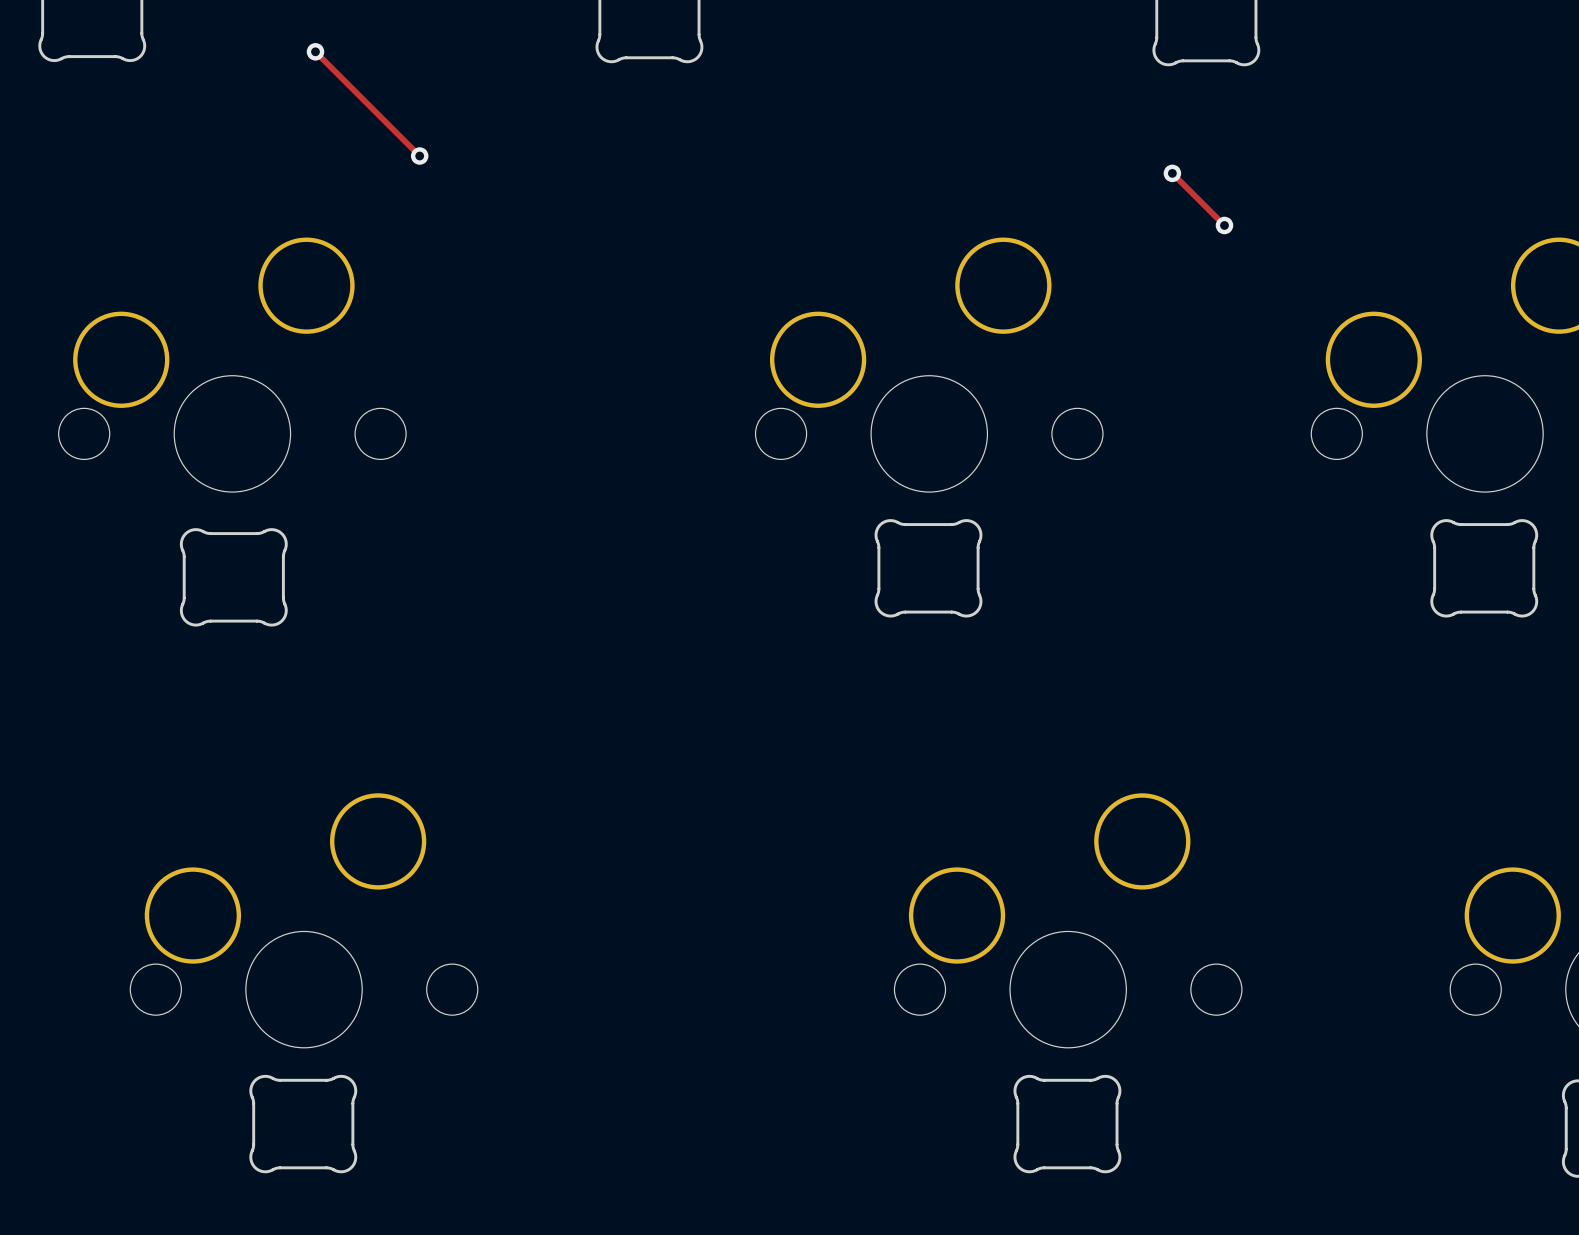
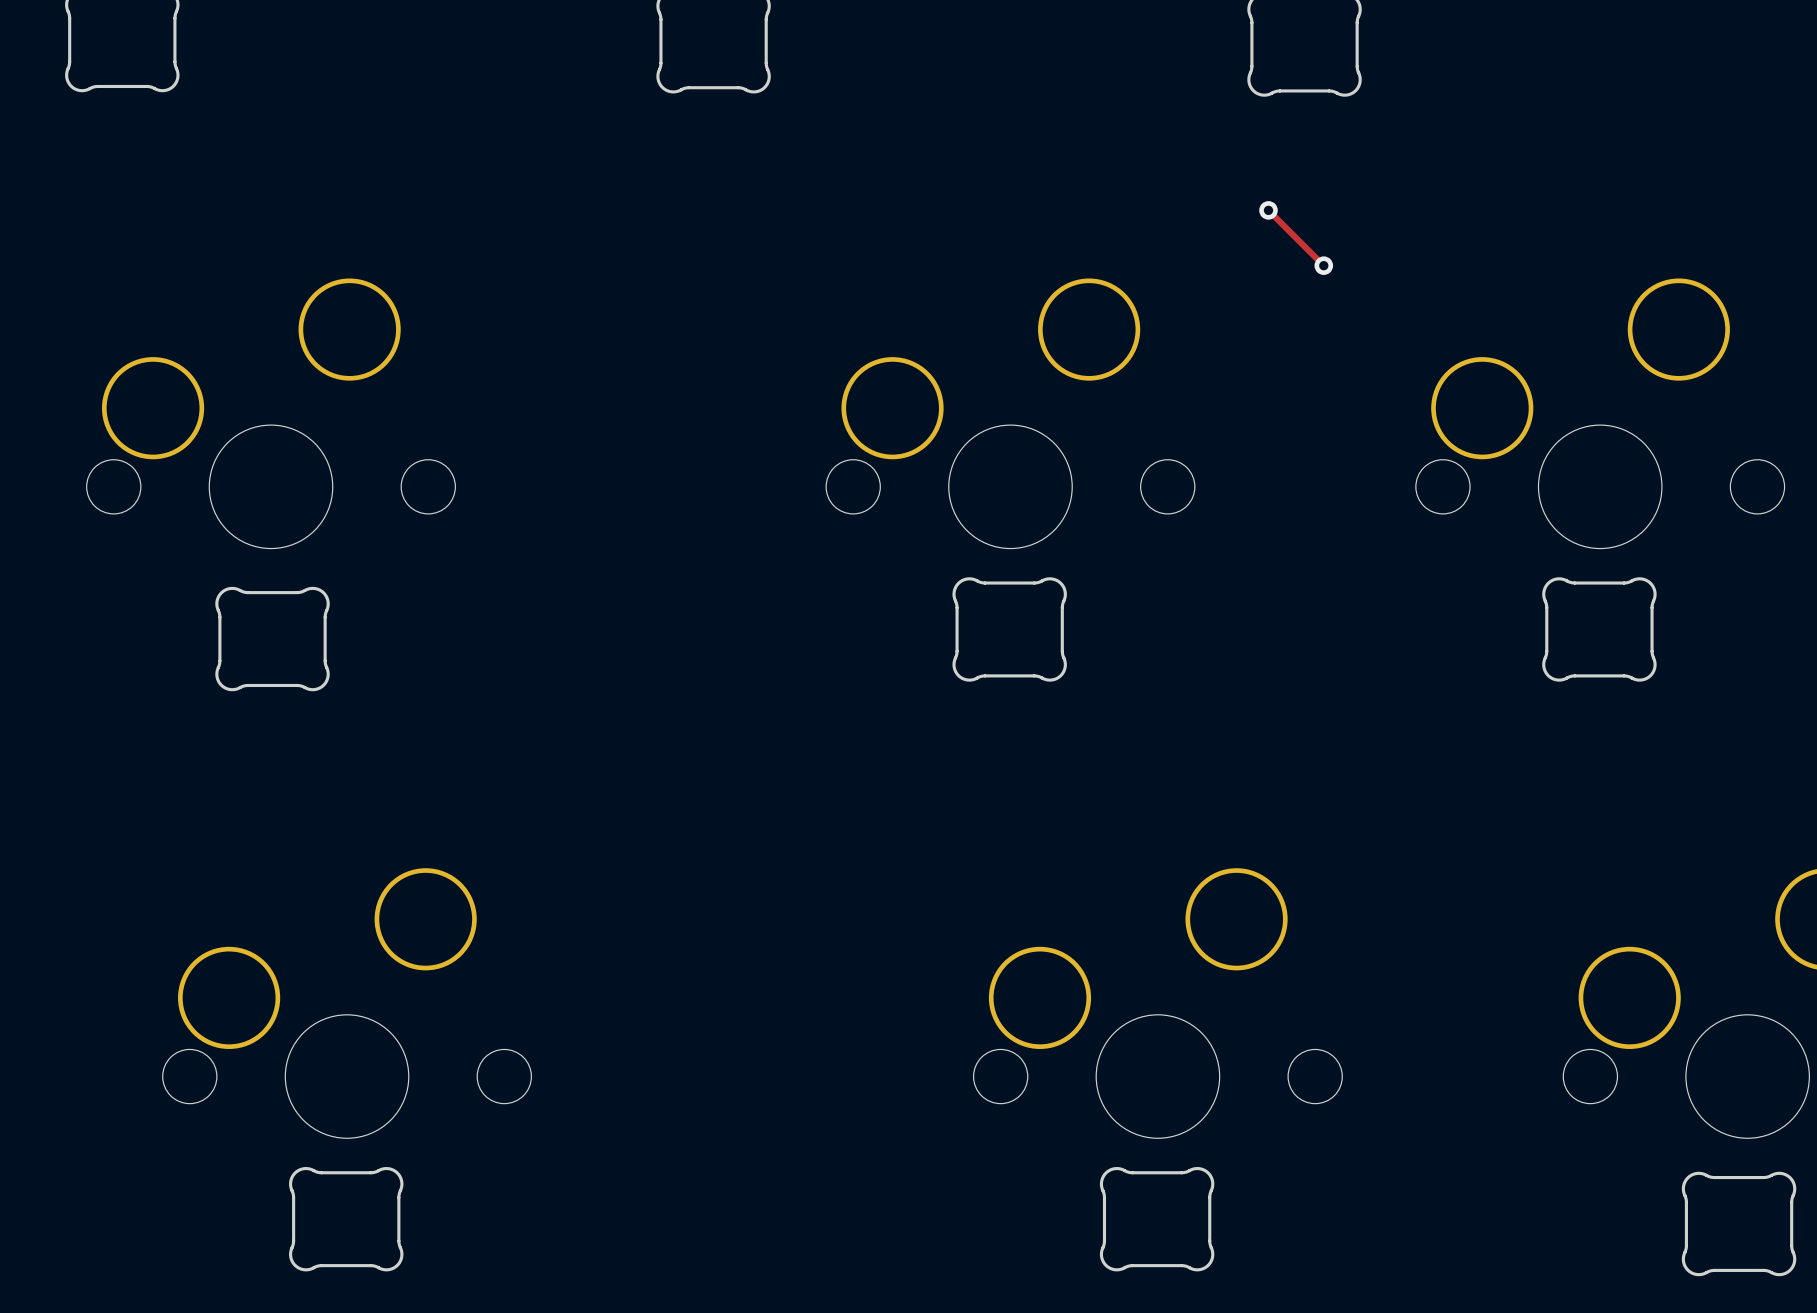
track: (315, 51) (419, 156) -> none
via: (315, 51) -> none
via: (419, 156) -> none

